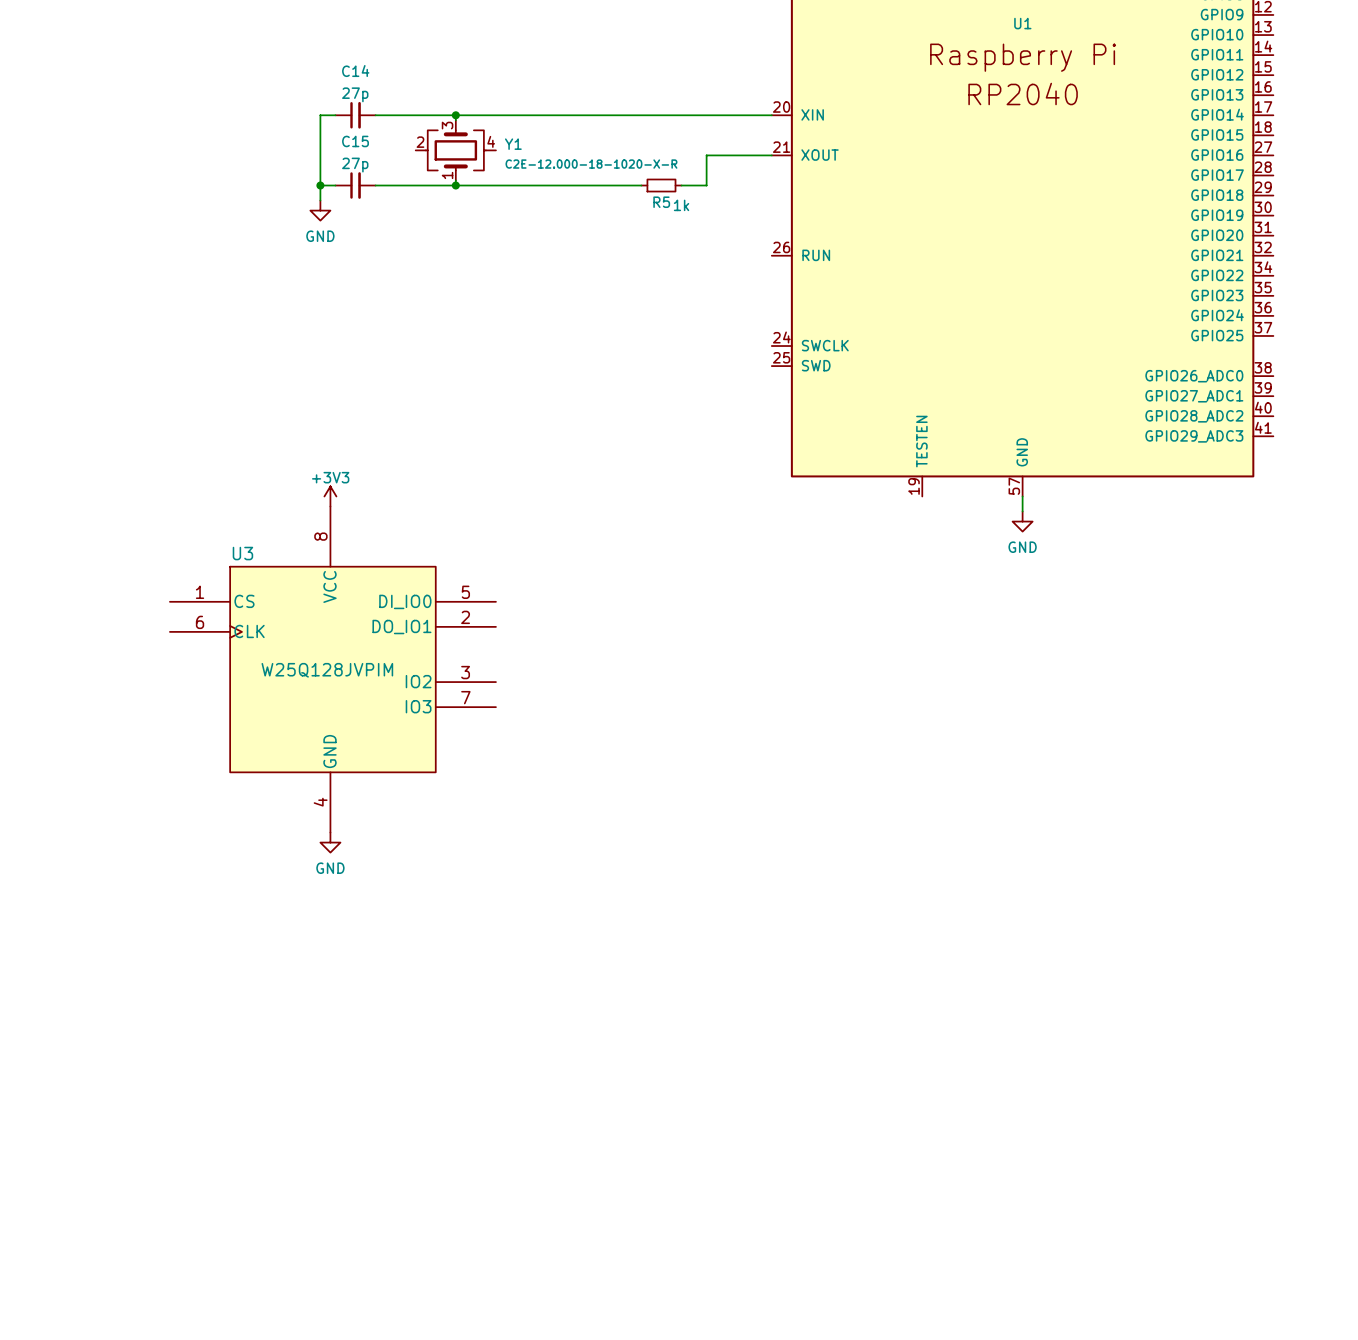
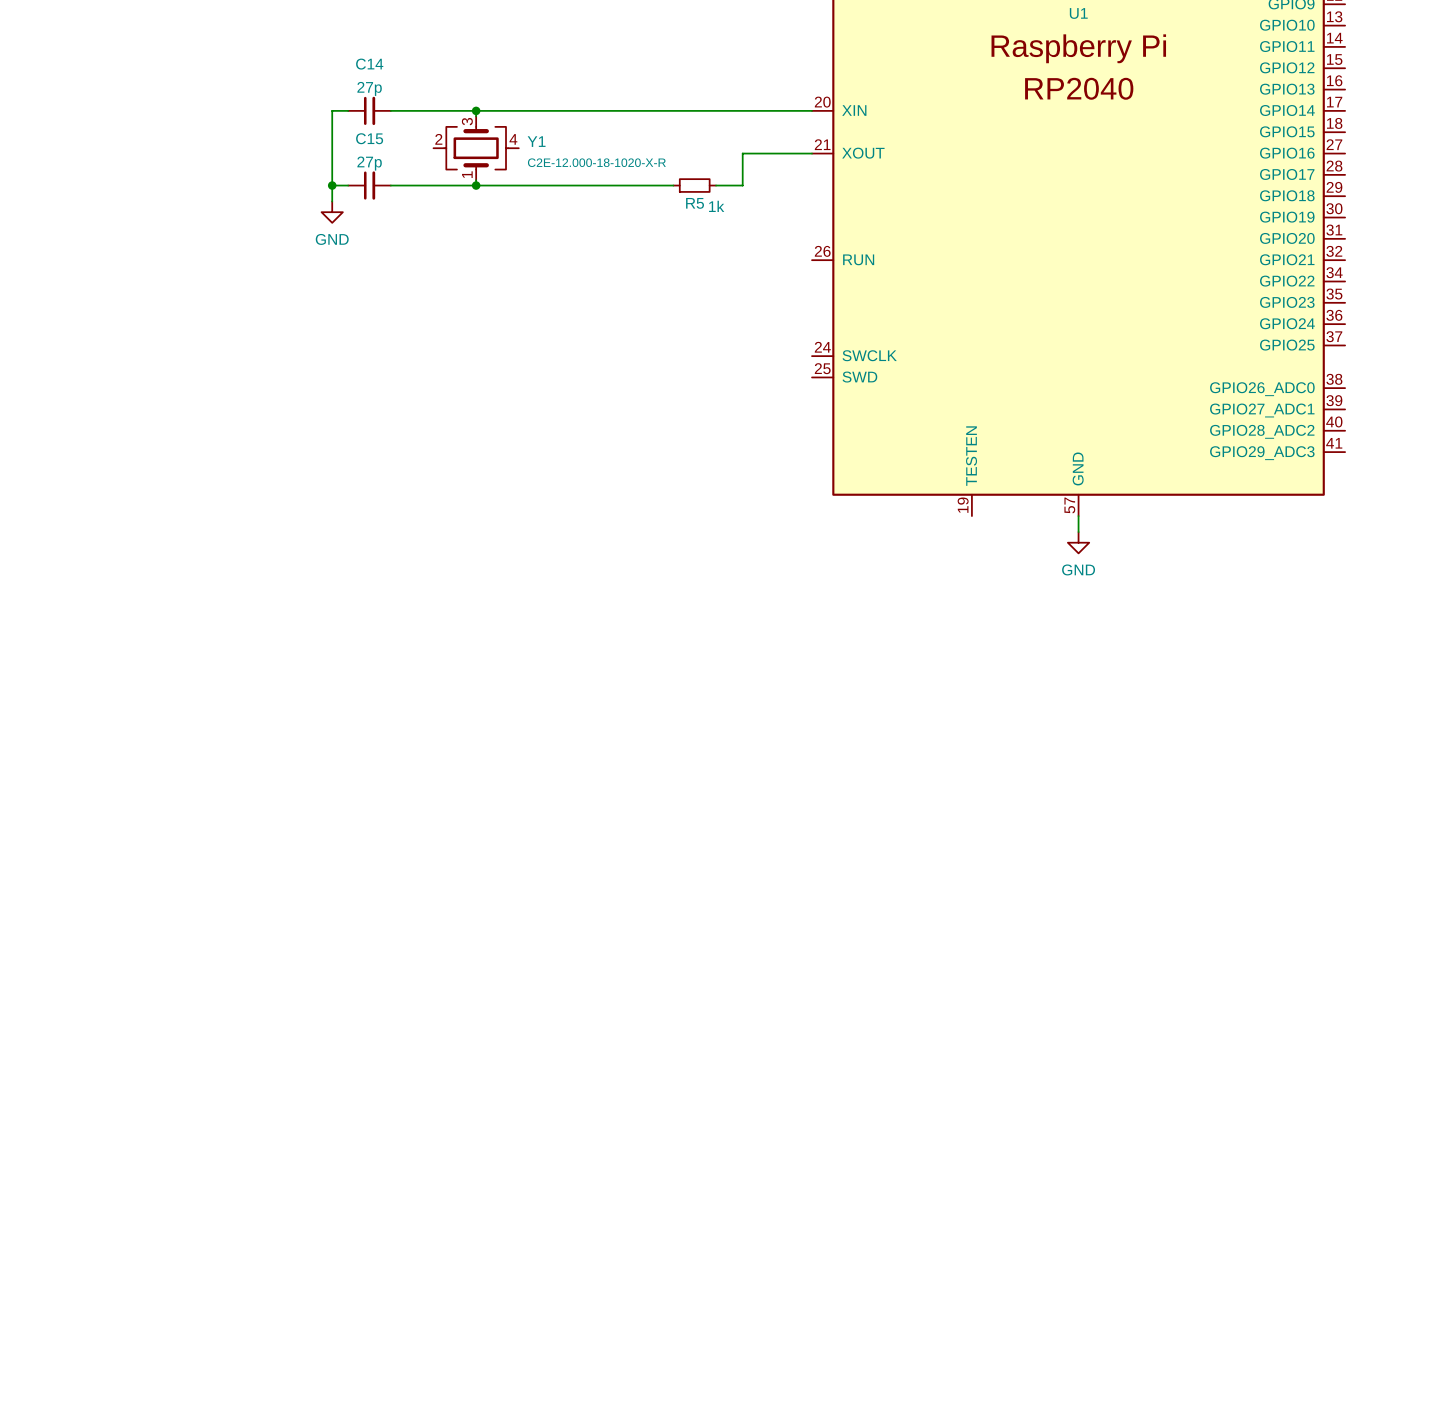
power symbol: +3V3 (330, 496) -> none
U3: W25Q128JVPIM (332, 669) -> none
power symbol: GND (330, 842) -> none

